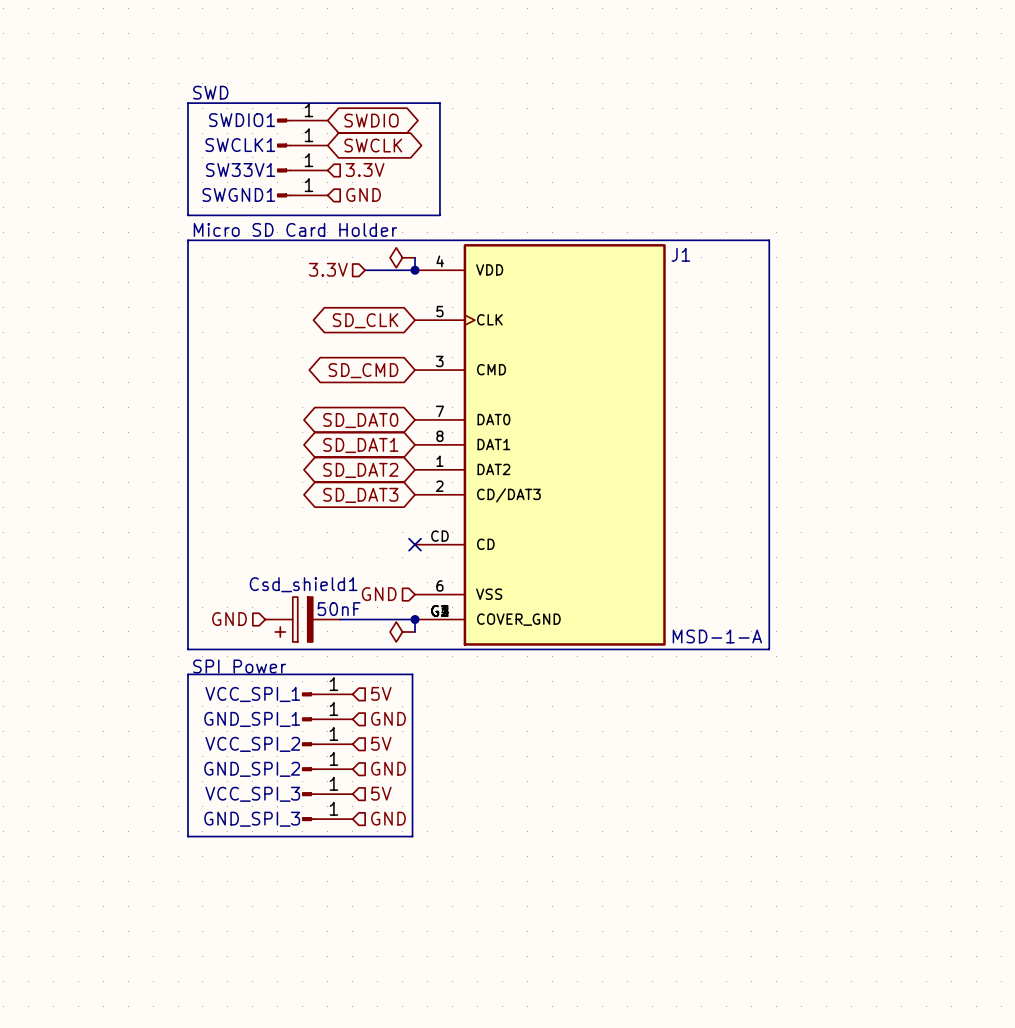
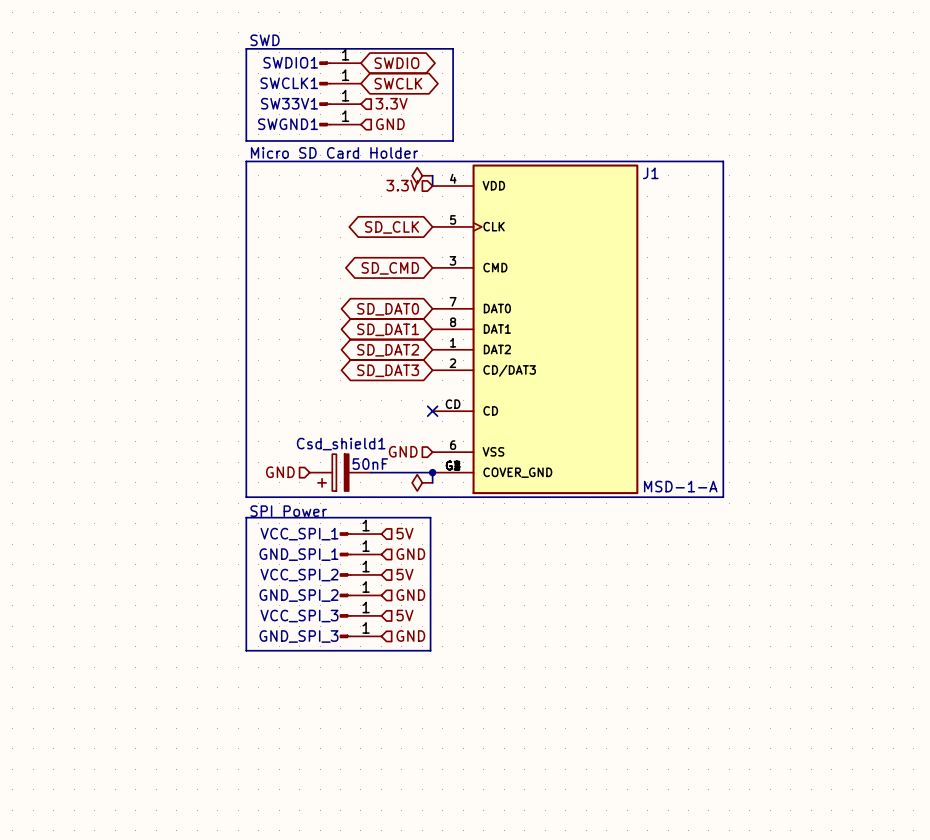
hierarchical label position: 3.3V (328, 269) -> 3.3V (402, 185)
wire: (365, 270) (415, 270) -> none
junction: (415, 270) -> none

